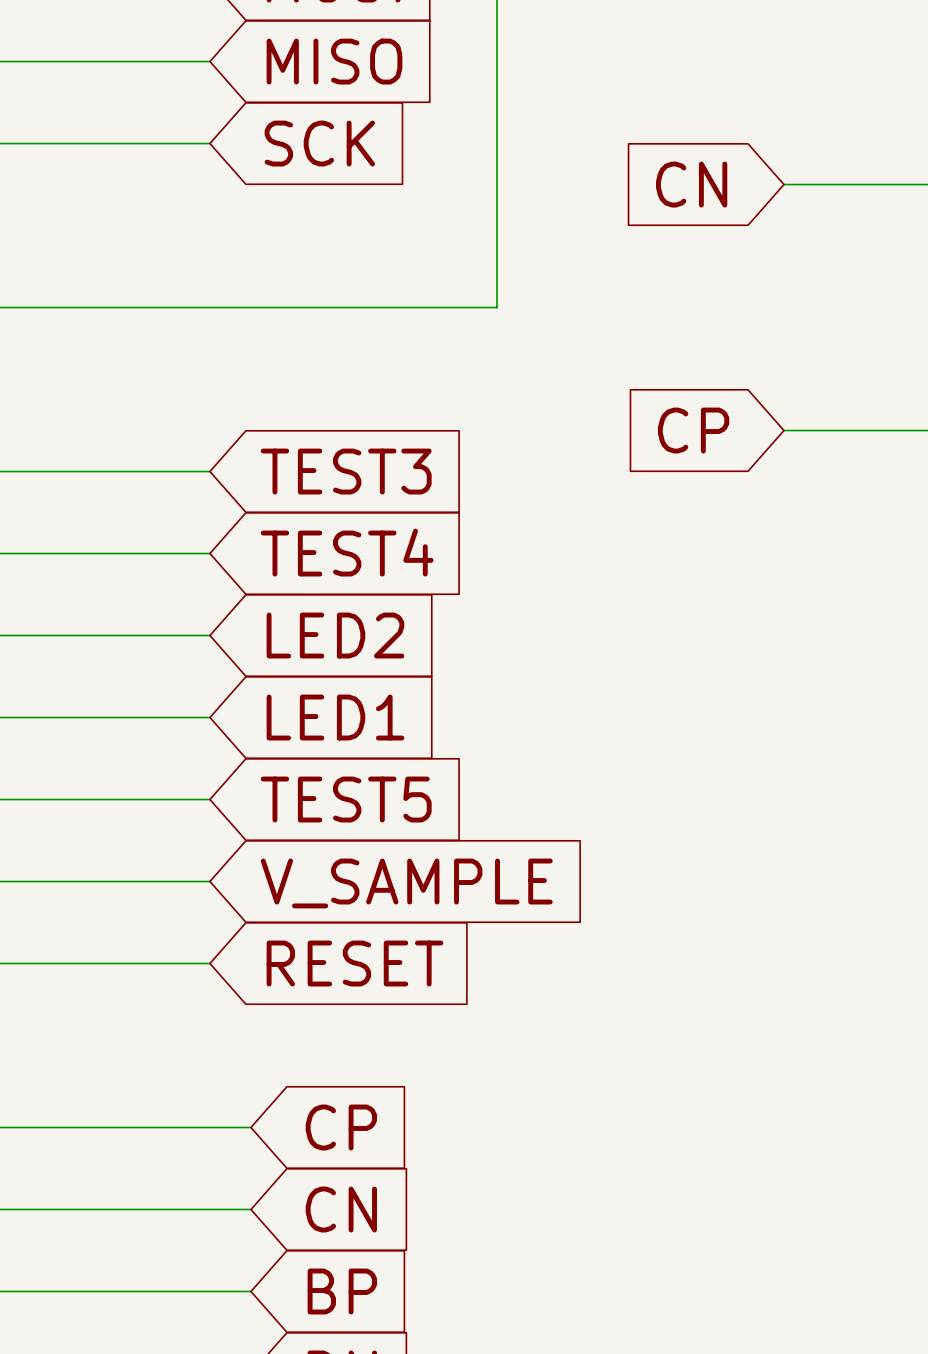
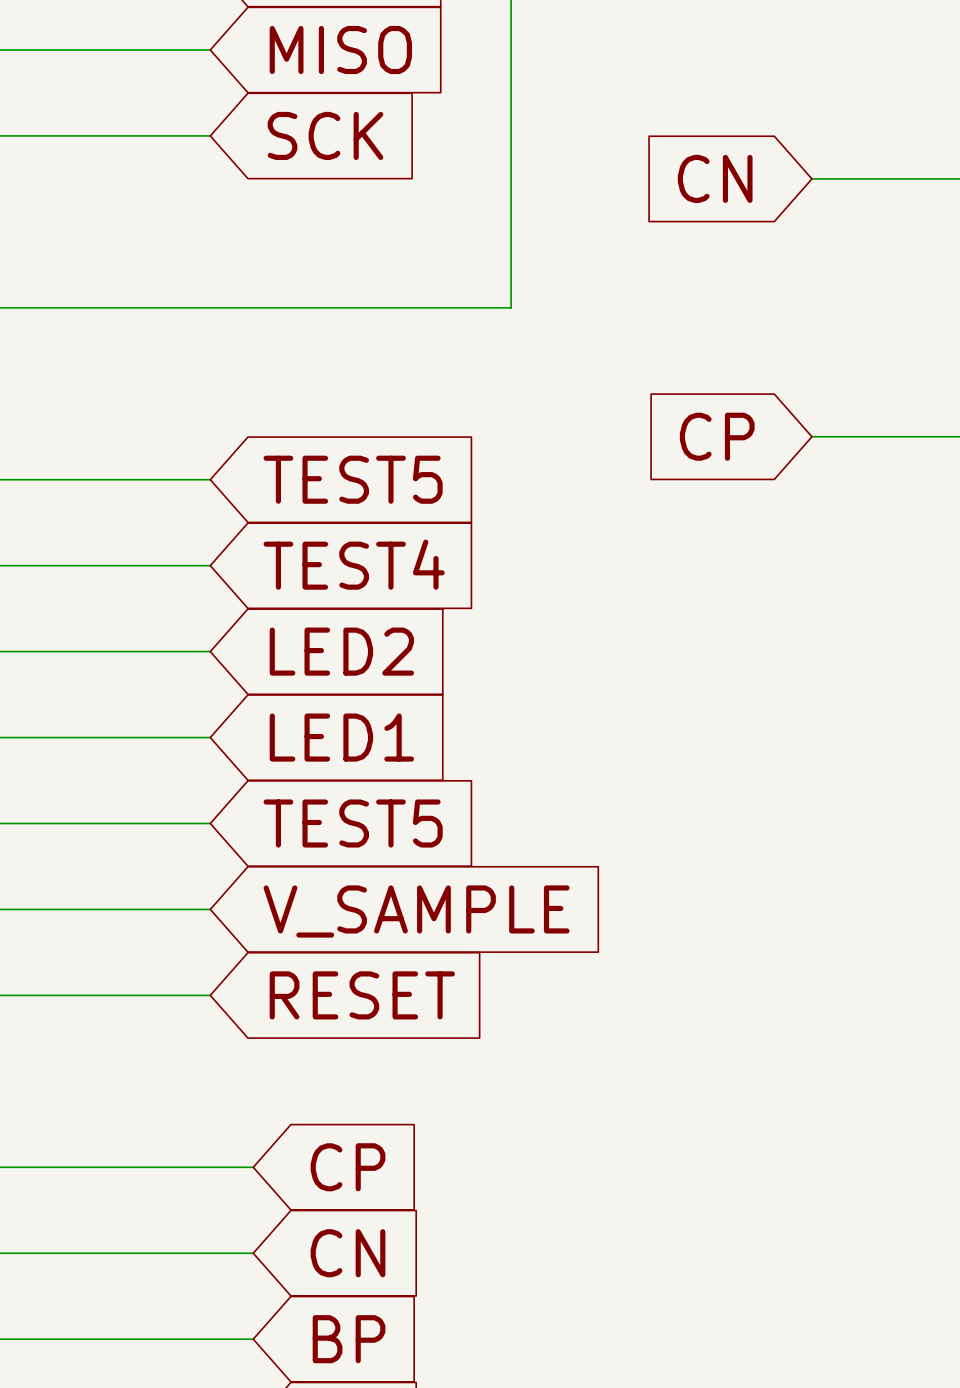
global label: TEST3 (346, 471) -> TEST5 (353, 479)

